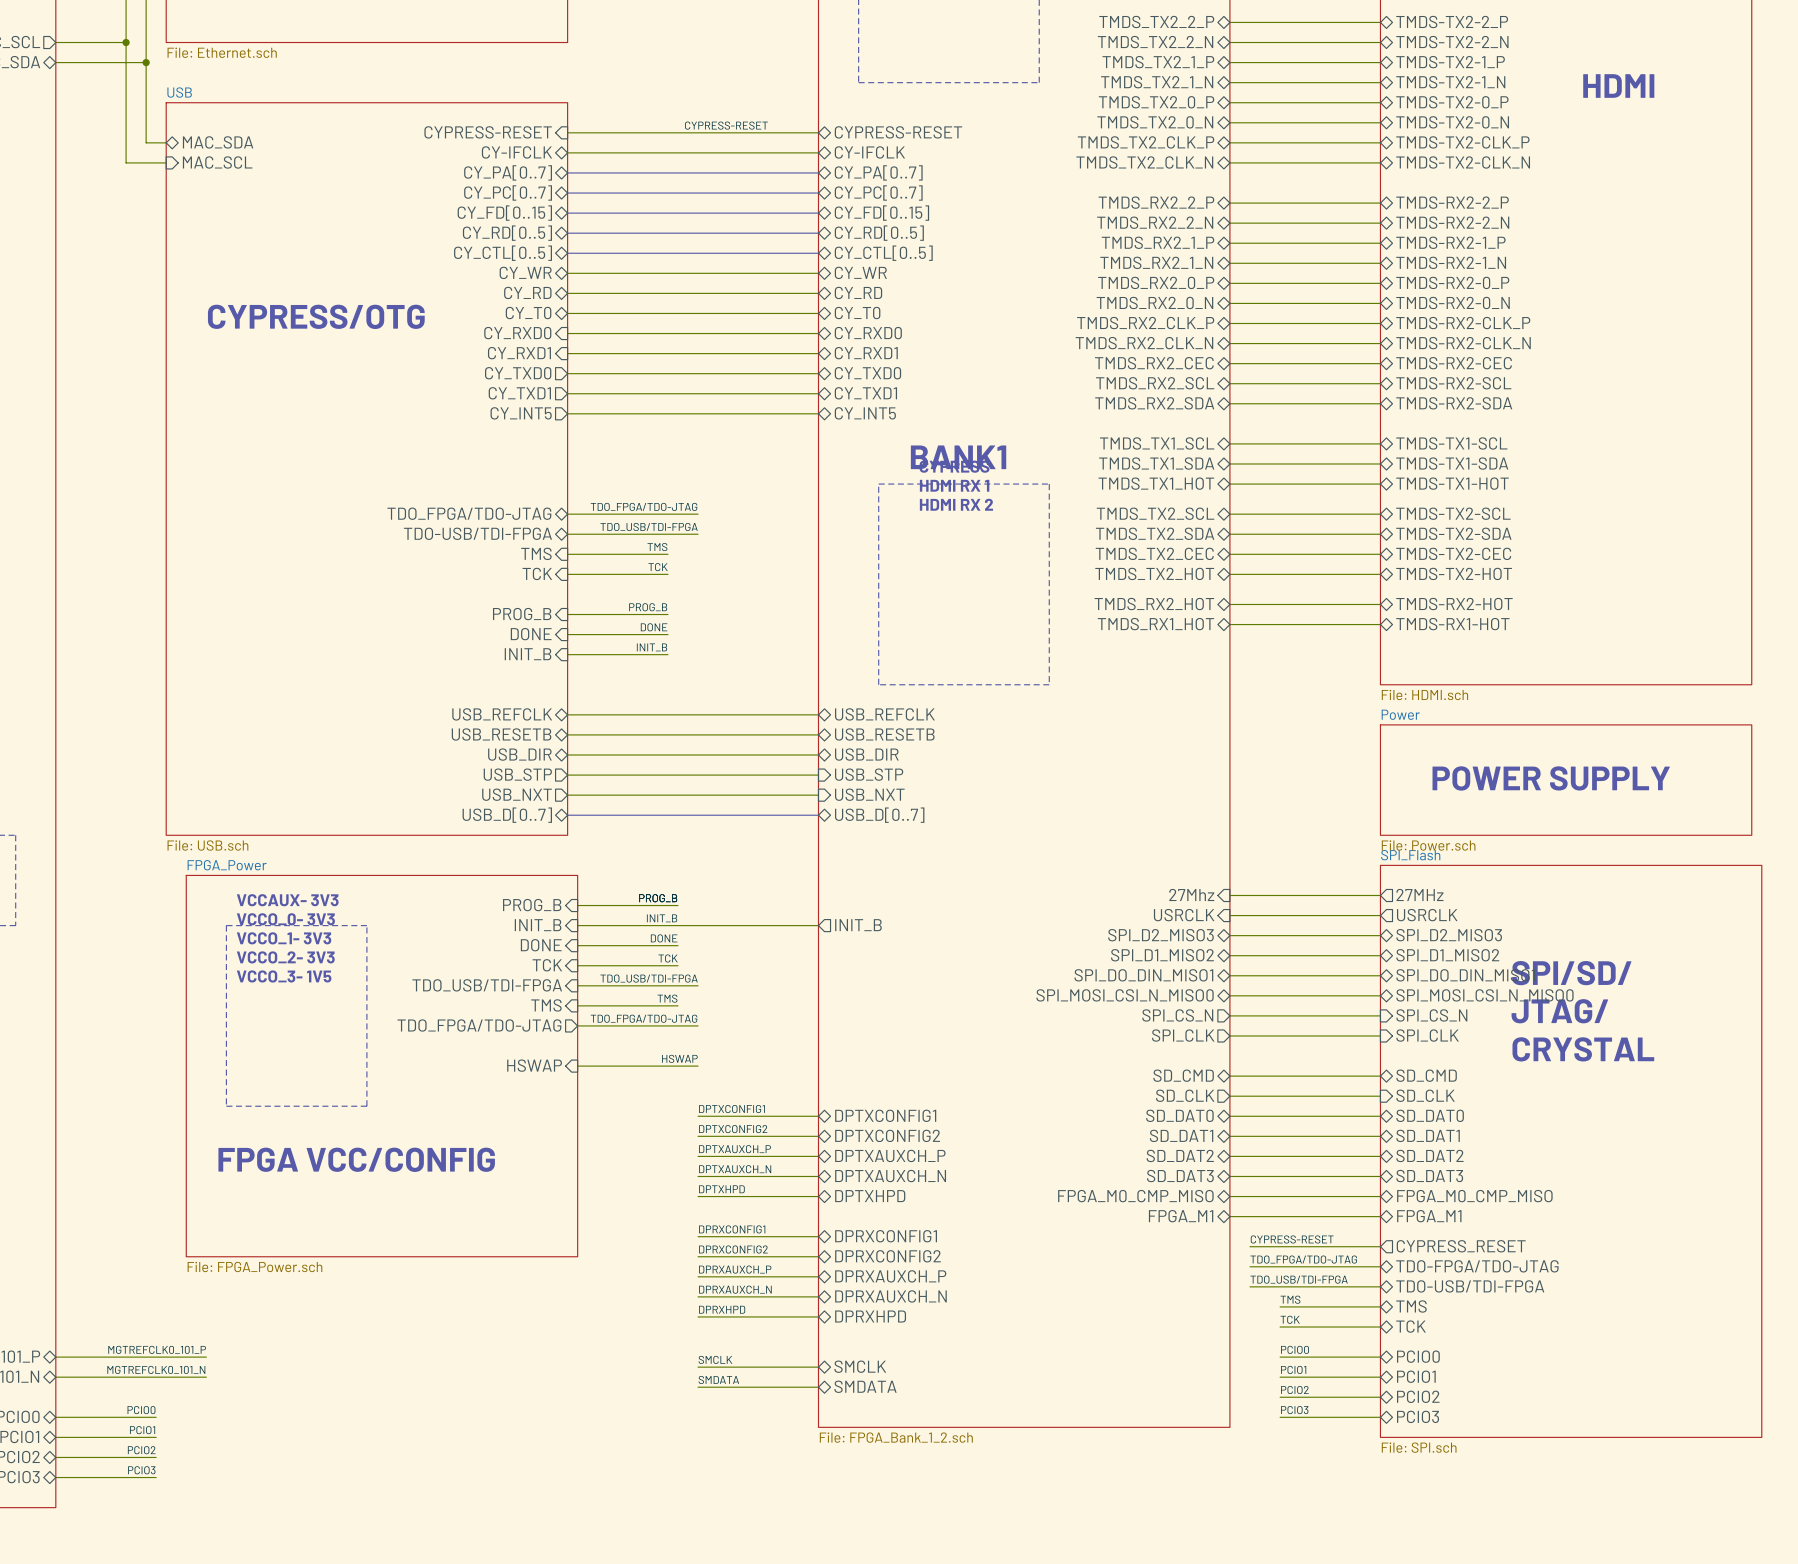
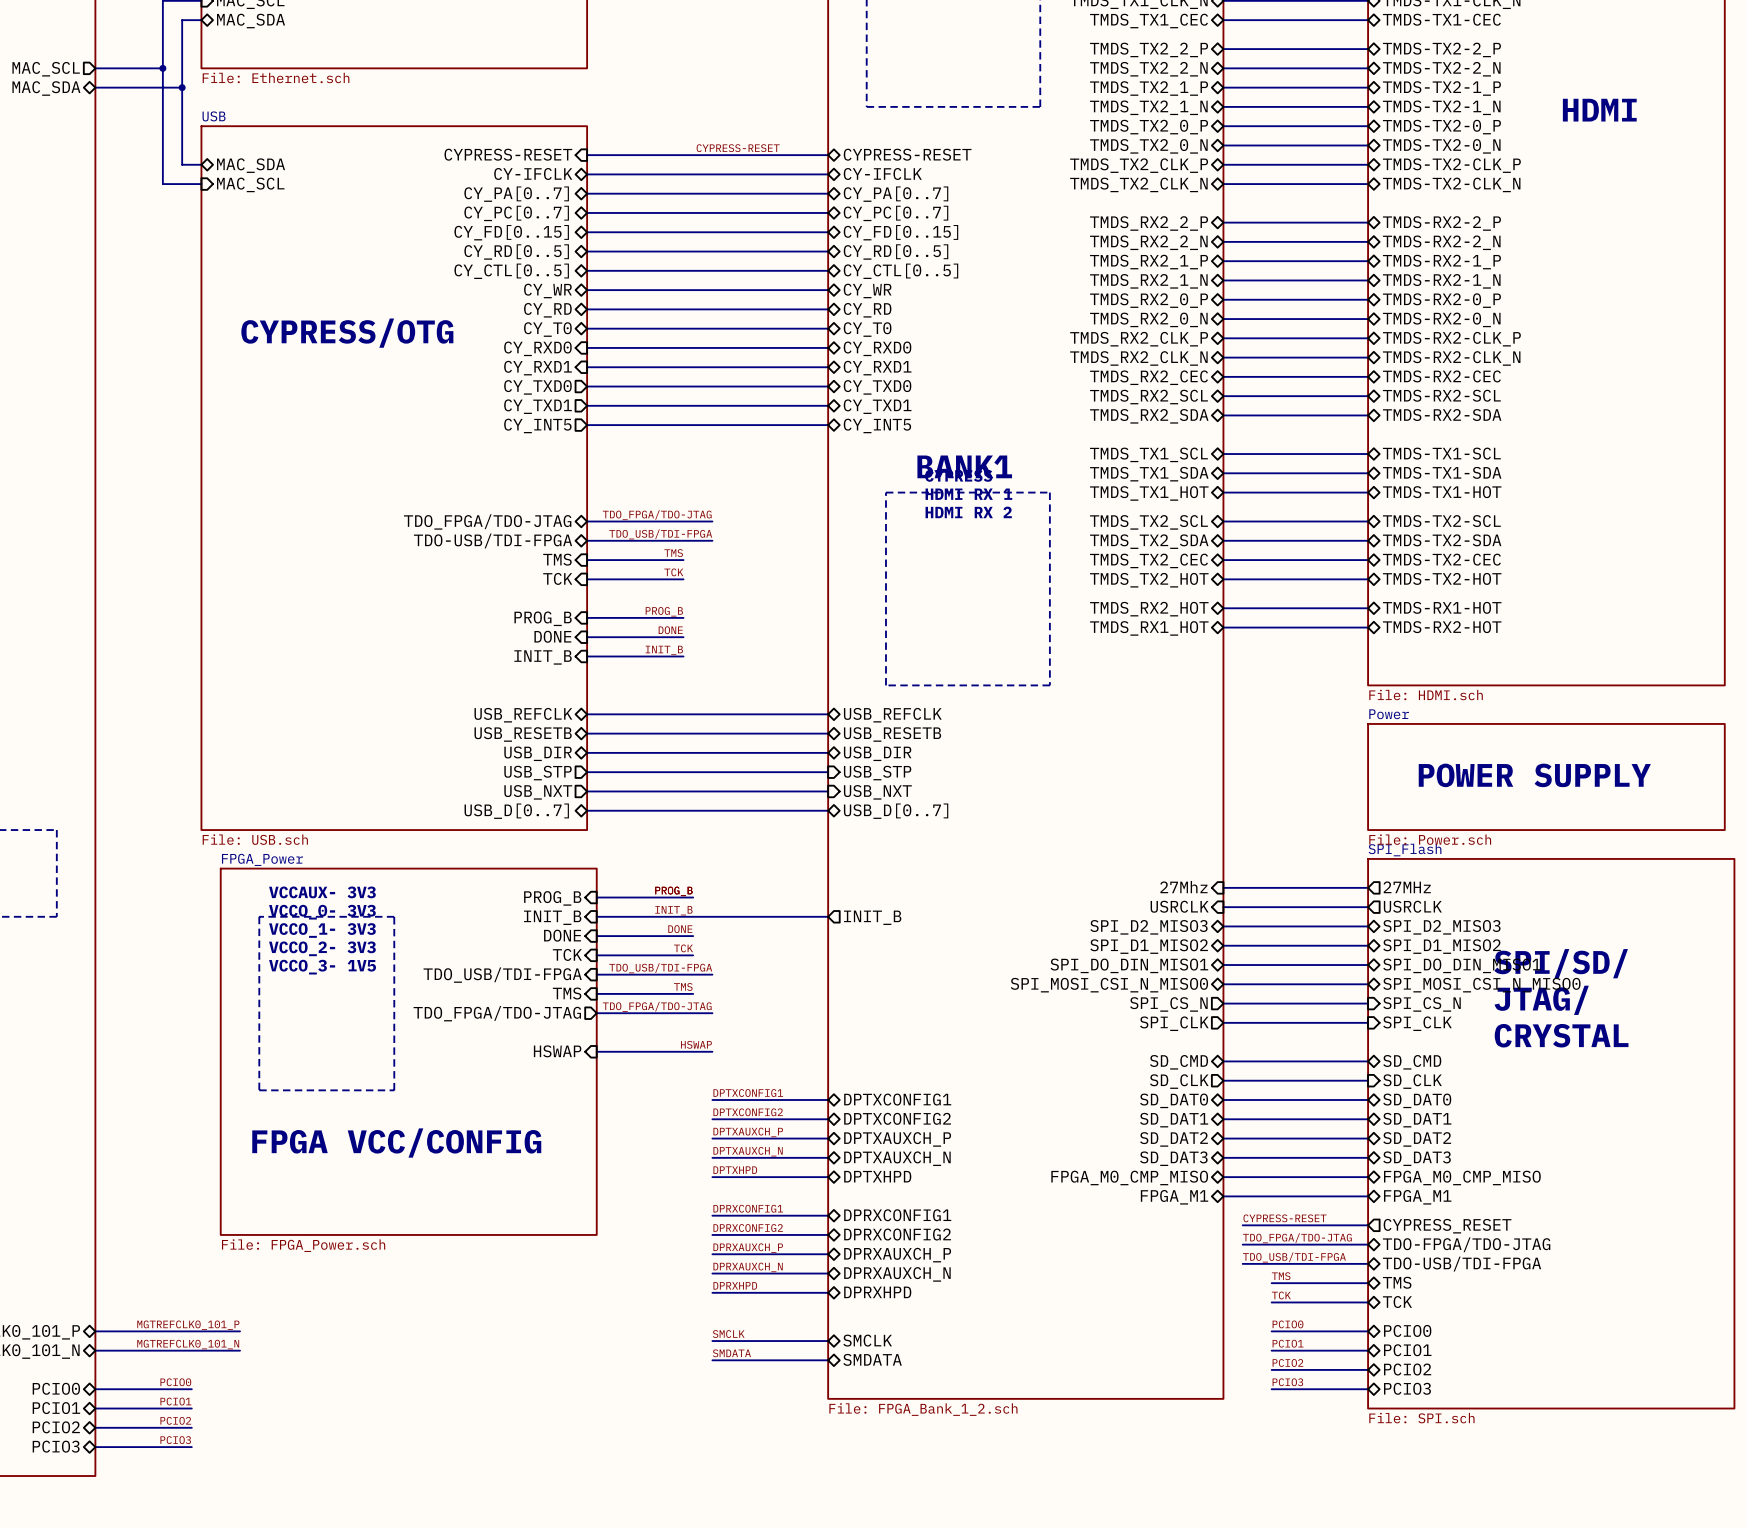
sheet pin: TMDS-RX2-HOT (1454, 604) -> TMDS-RX1-HOT (1442, 607)
sheet pin: TMDS-RX1-HOT (1452, 624) -> TMDS-RX2-HOT (1442, 627)

